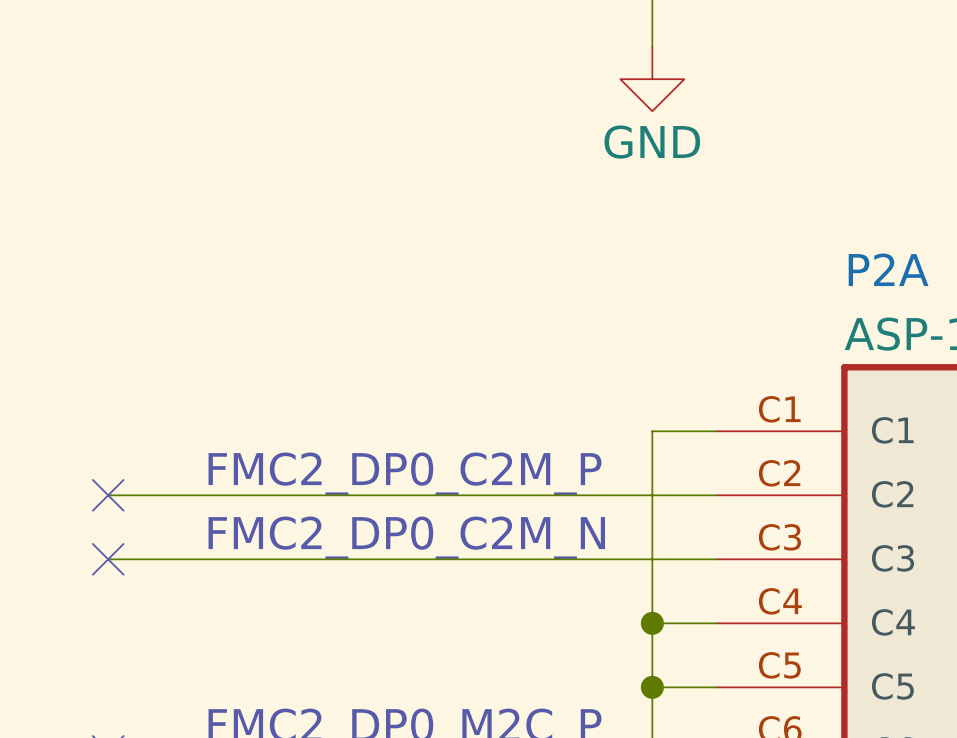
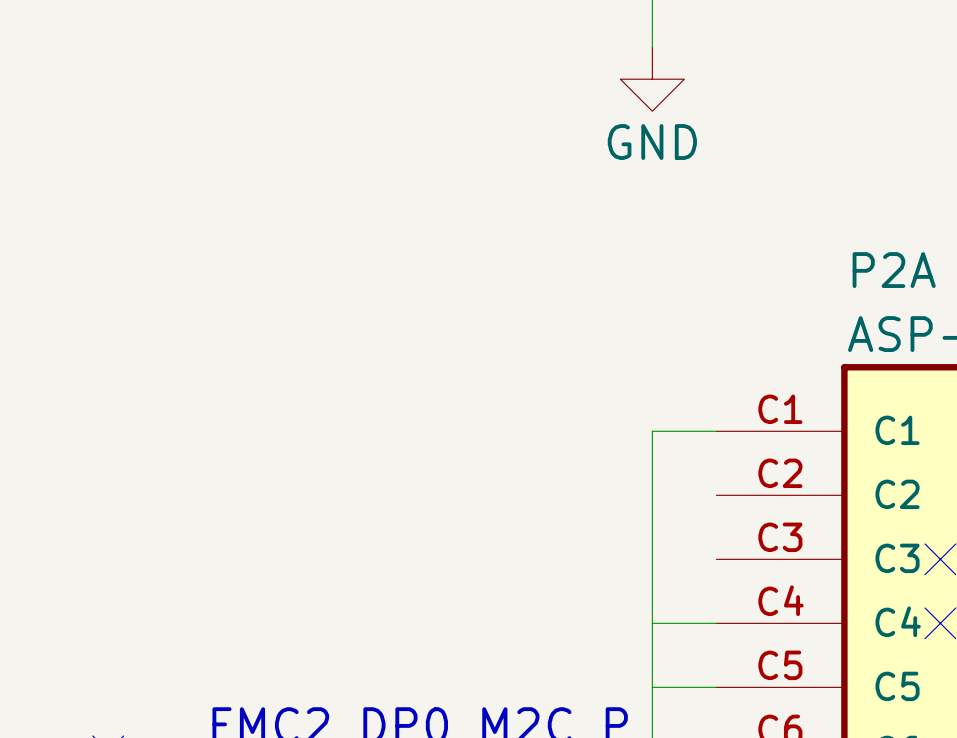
text: FMC2_DP0_C2M_P (405, 473) -> none
wire: (108, 495) (716, 495) -> none
no-connect mark: (108, 495) -> none
text: FMC2_DP0_C2M_N (406, 537) -> none
wire: (108, 559) (716, 559) -> none
no-connect mark: (108, 559) -> none
no-connect mark: none -> (940, 559)
junction: (652, 623) -> none
no-connect mark: none -> (940, 623)
junction: (652, 687) -> none

